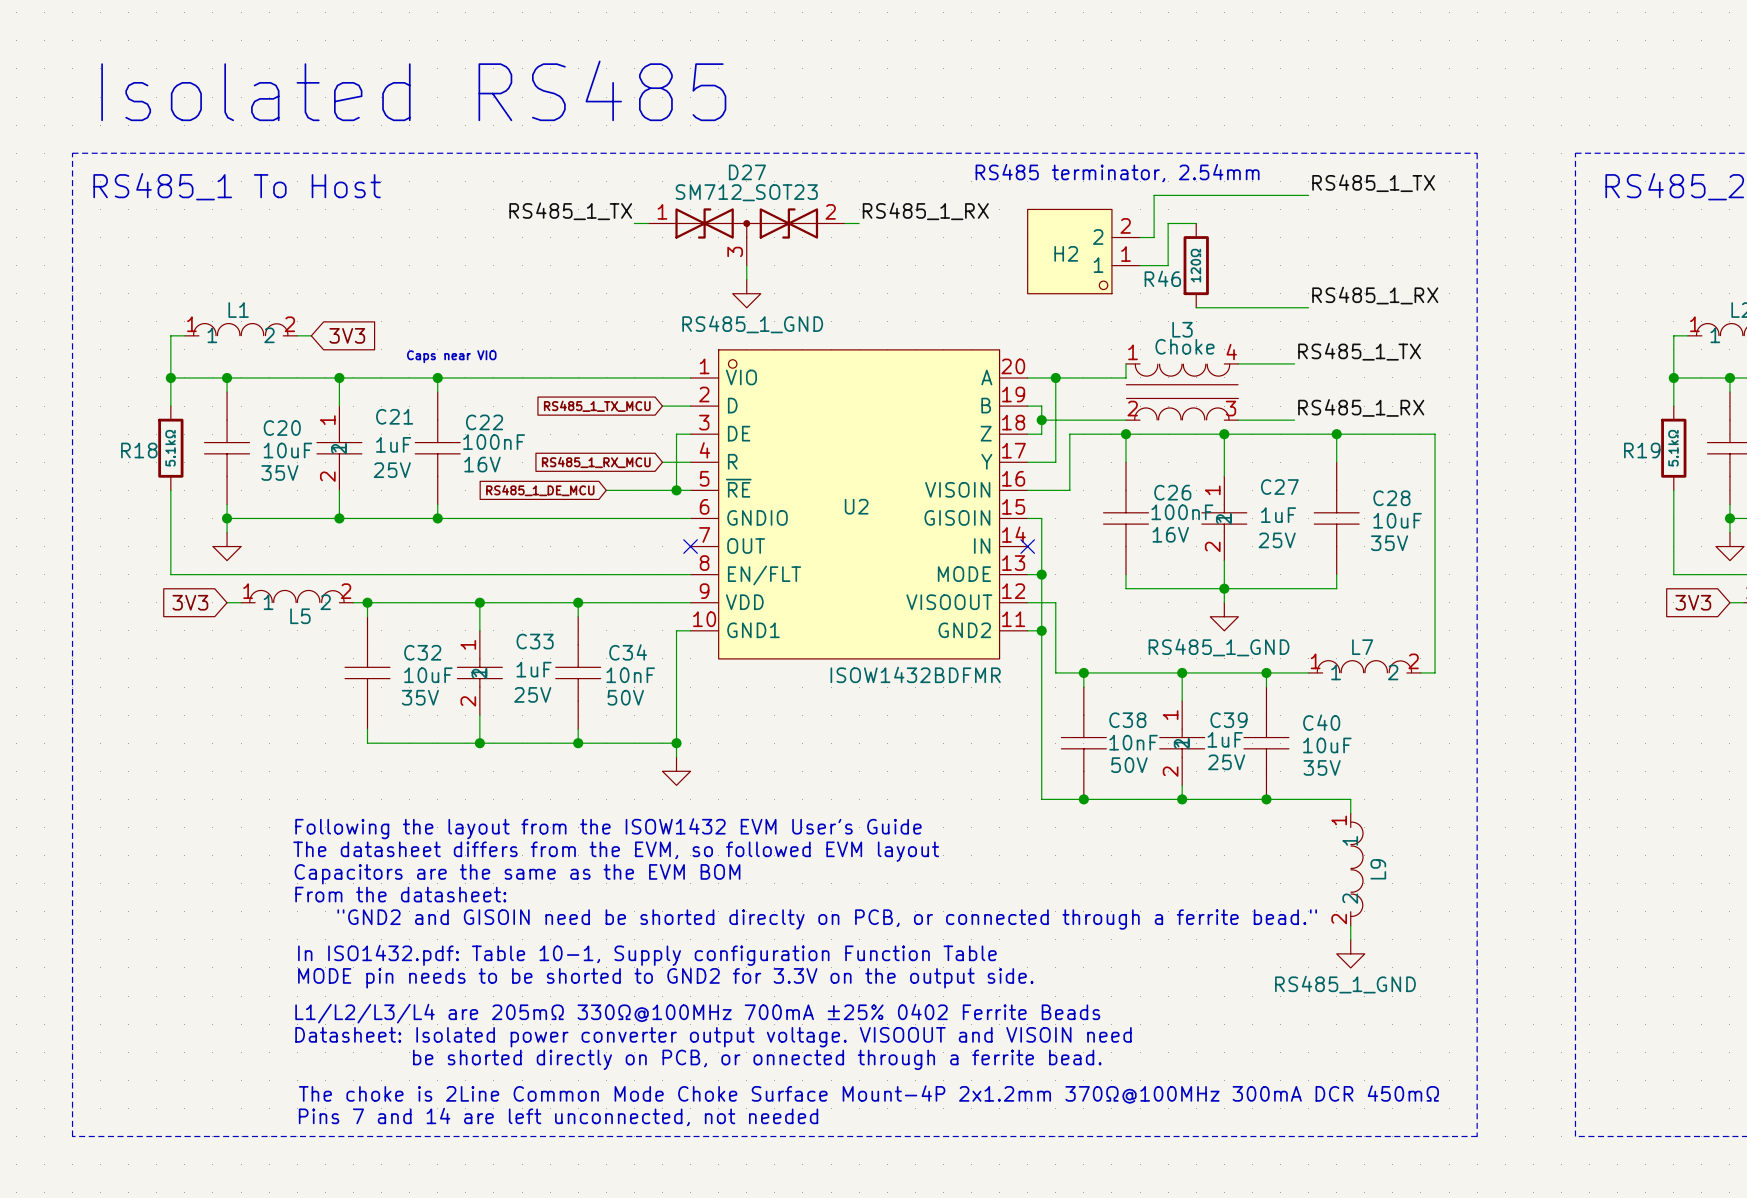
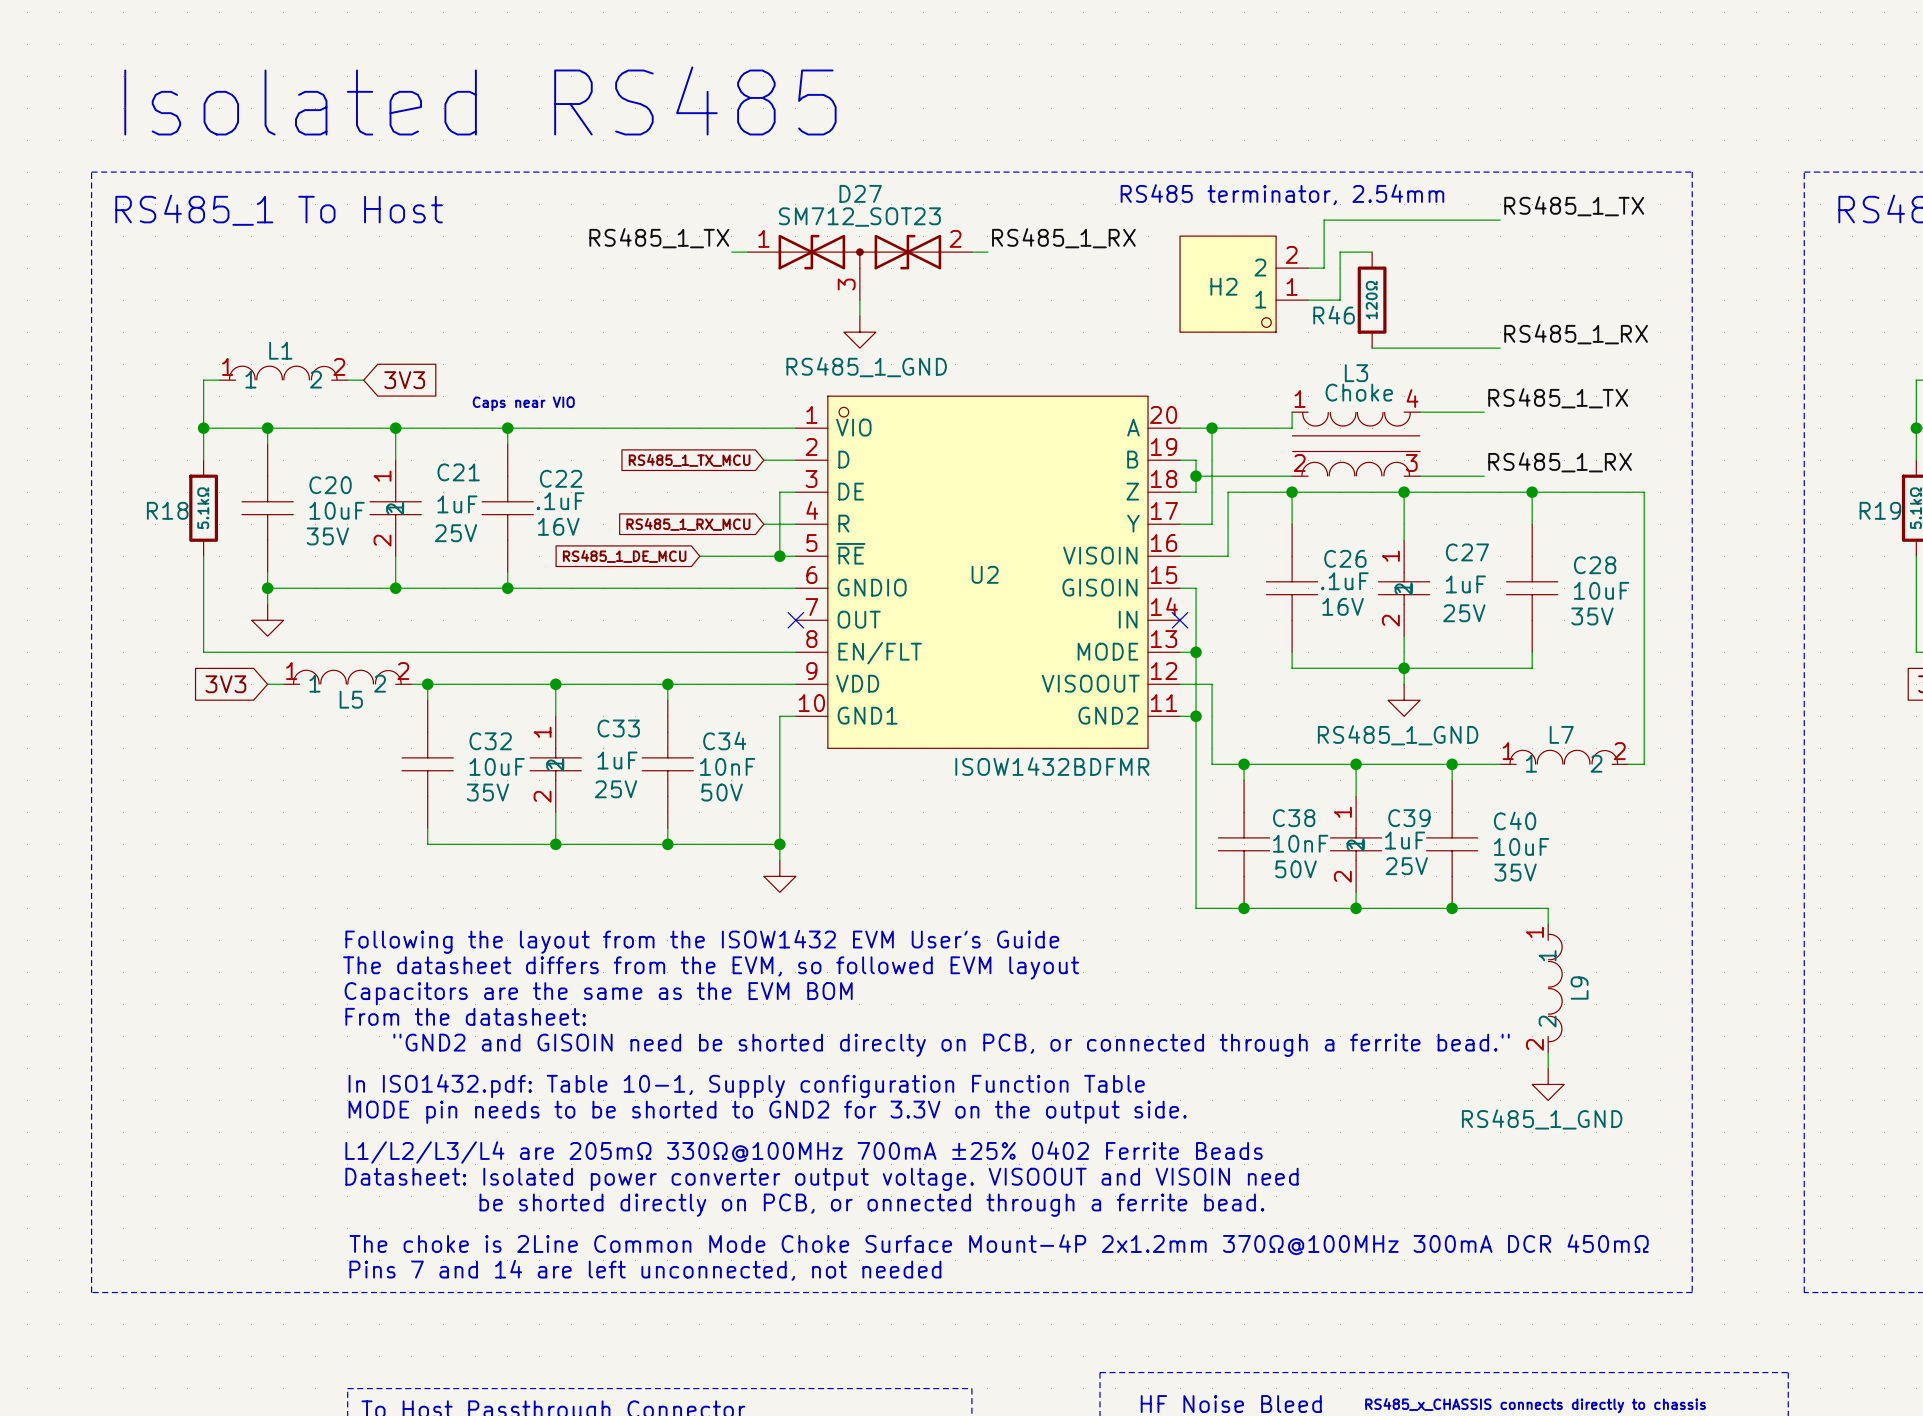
C22 value: 100nF (494, 442) -> .1uF (560, 501)
C26 value: 100nF (1182, 512) -> .1uF (1344, 581)

